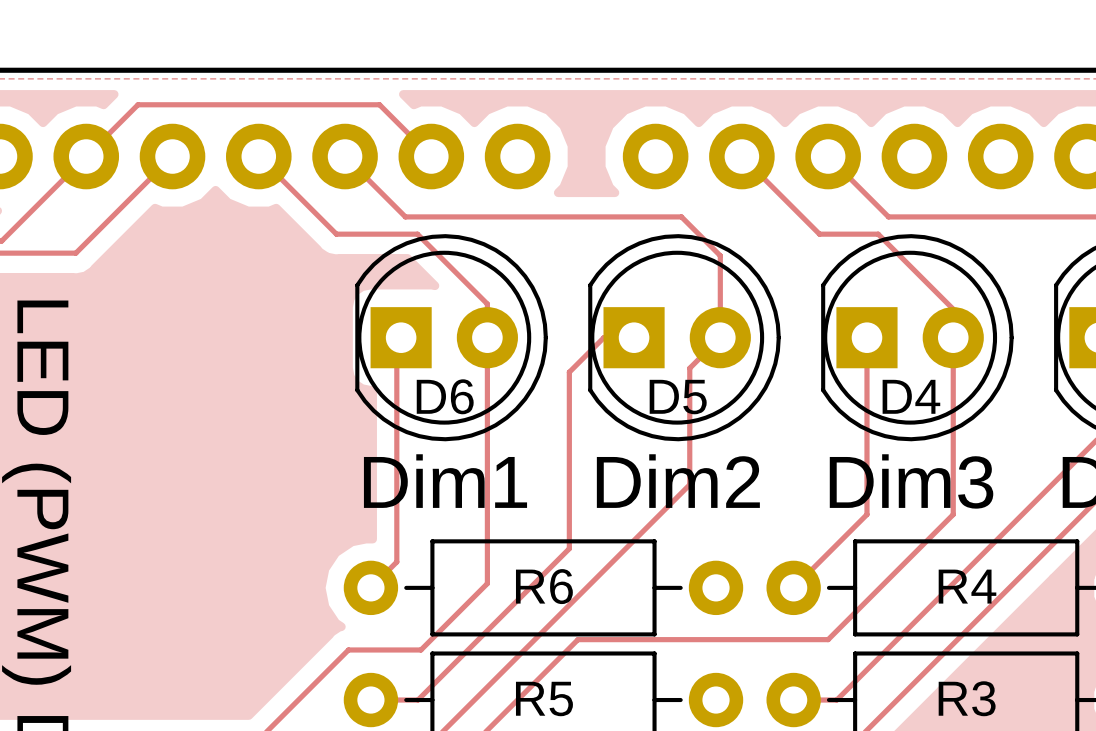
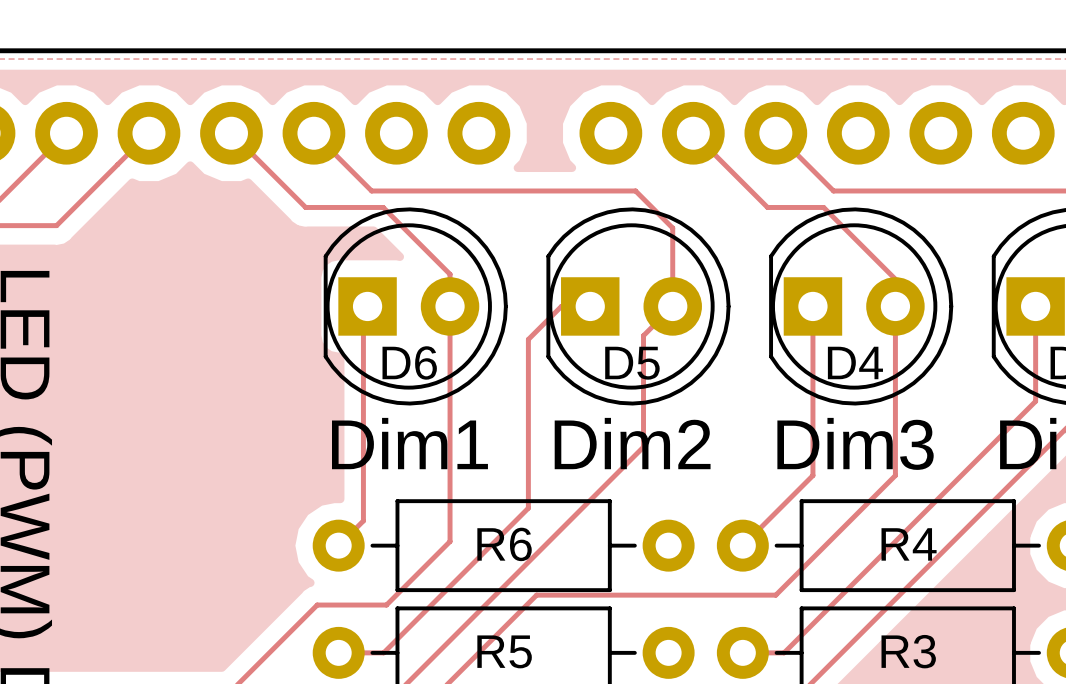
track: (86, 156) (138, 104) (379, 104) (431, 156) -> none

